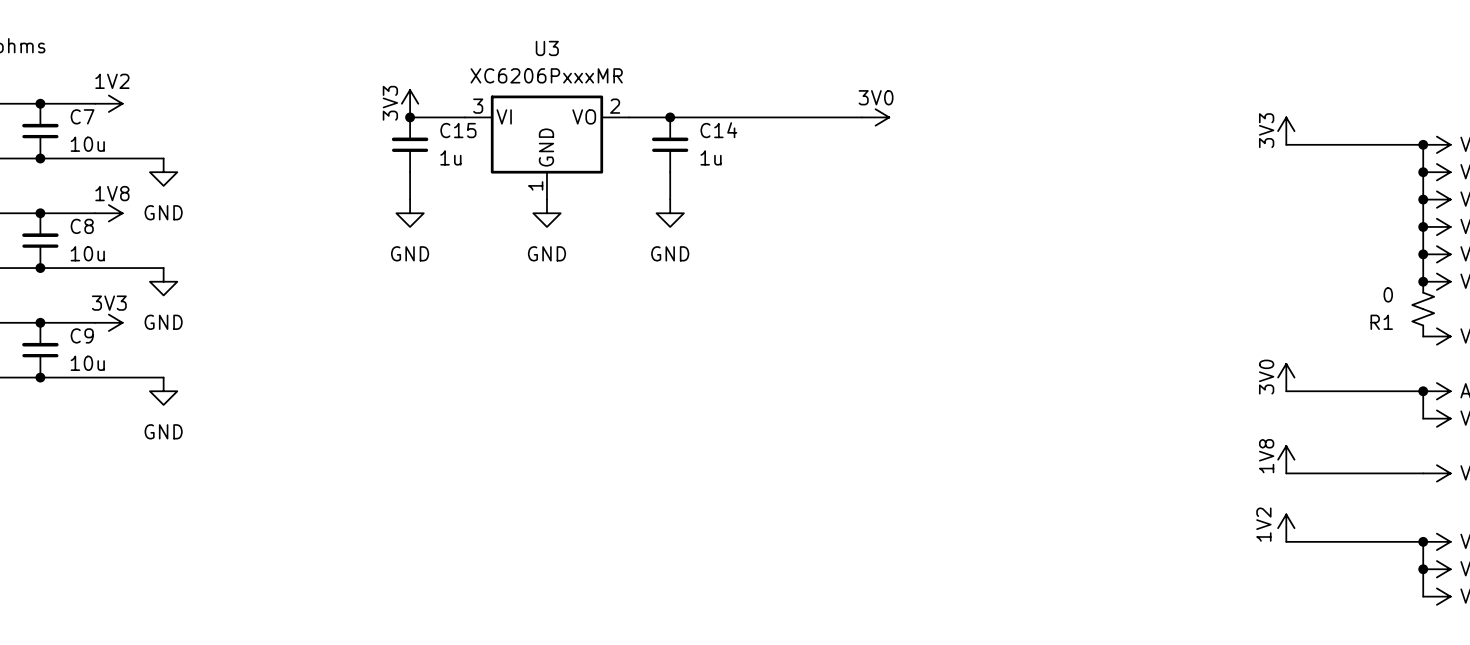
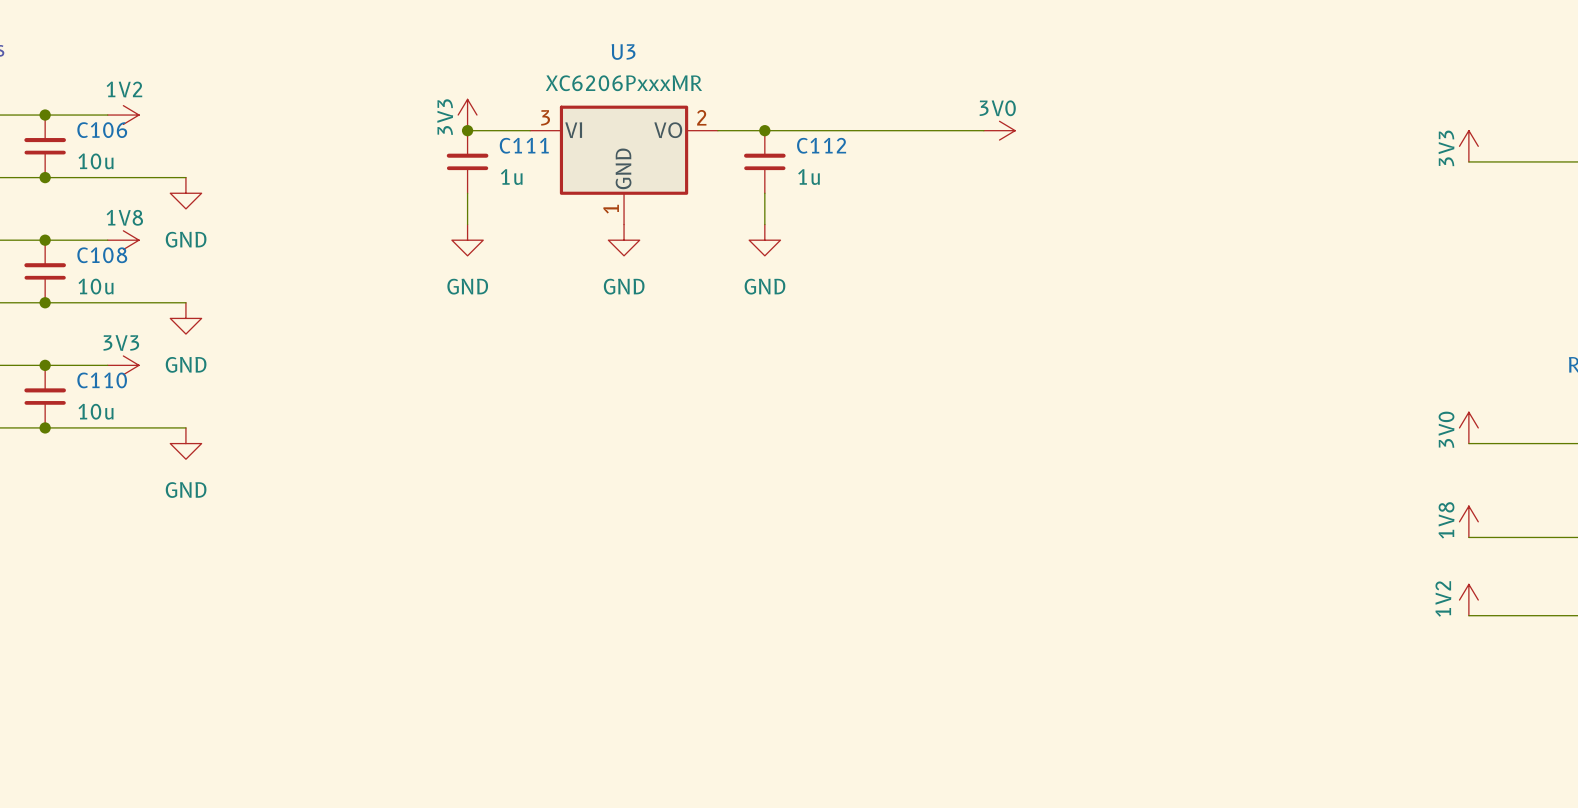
C7 name: C7 (82, 116) -> C106 (102, 130)
C15 name: C15 (458, 130) -> C111 (524, 145)
C14 name: C14 (718, 130) -> C112 (821, 145)
C8 name: C8 (82, 226) -> C108 (102, 255)
C9 name: C9 (82, 335) -> C110 (102, 380)

